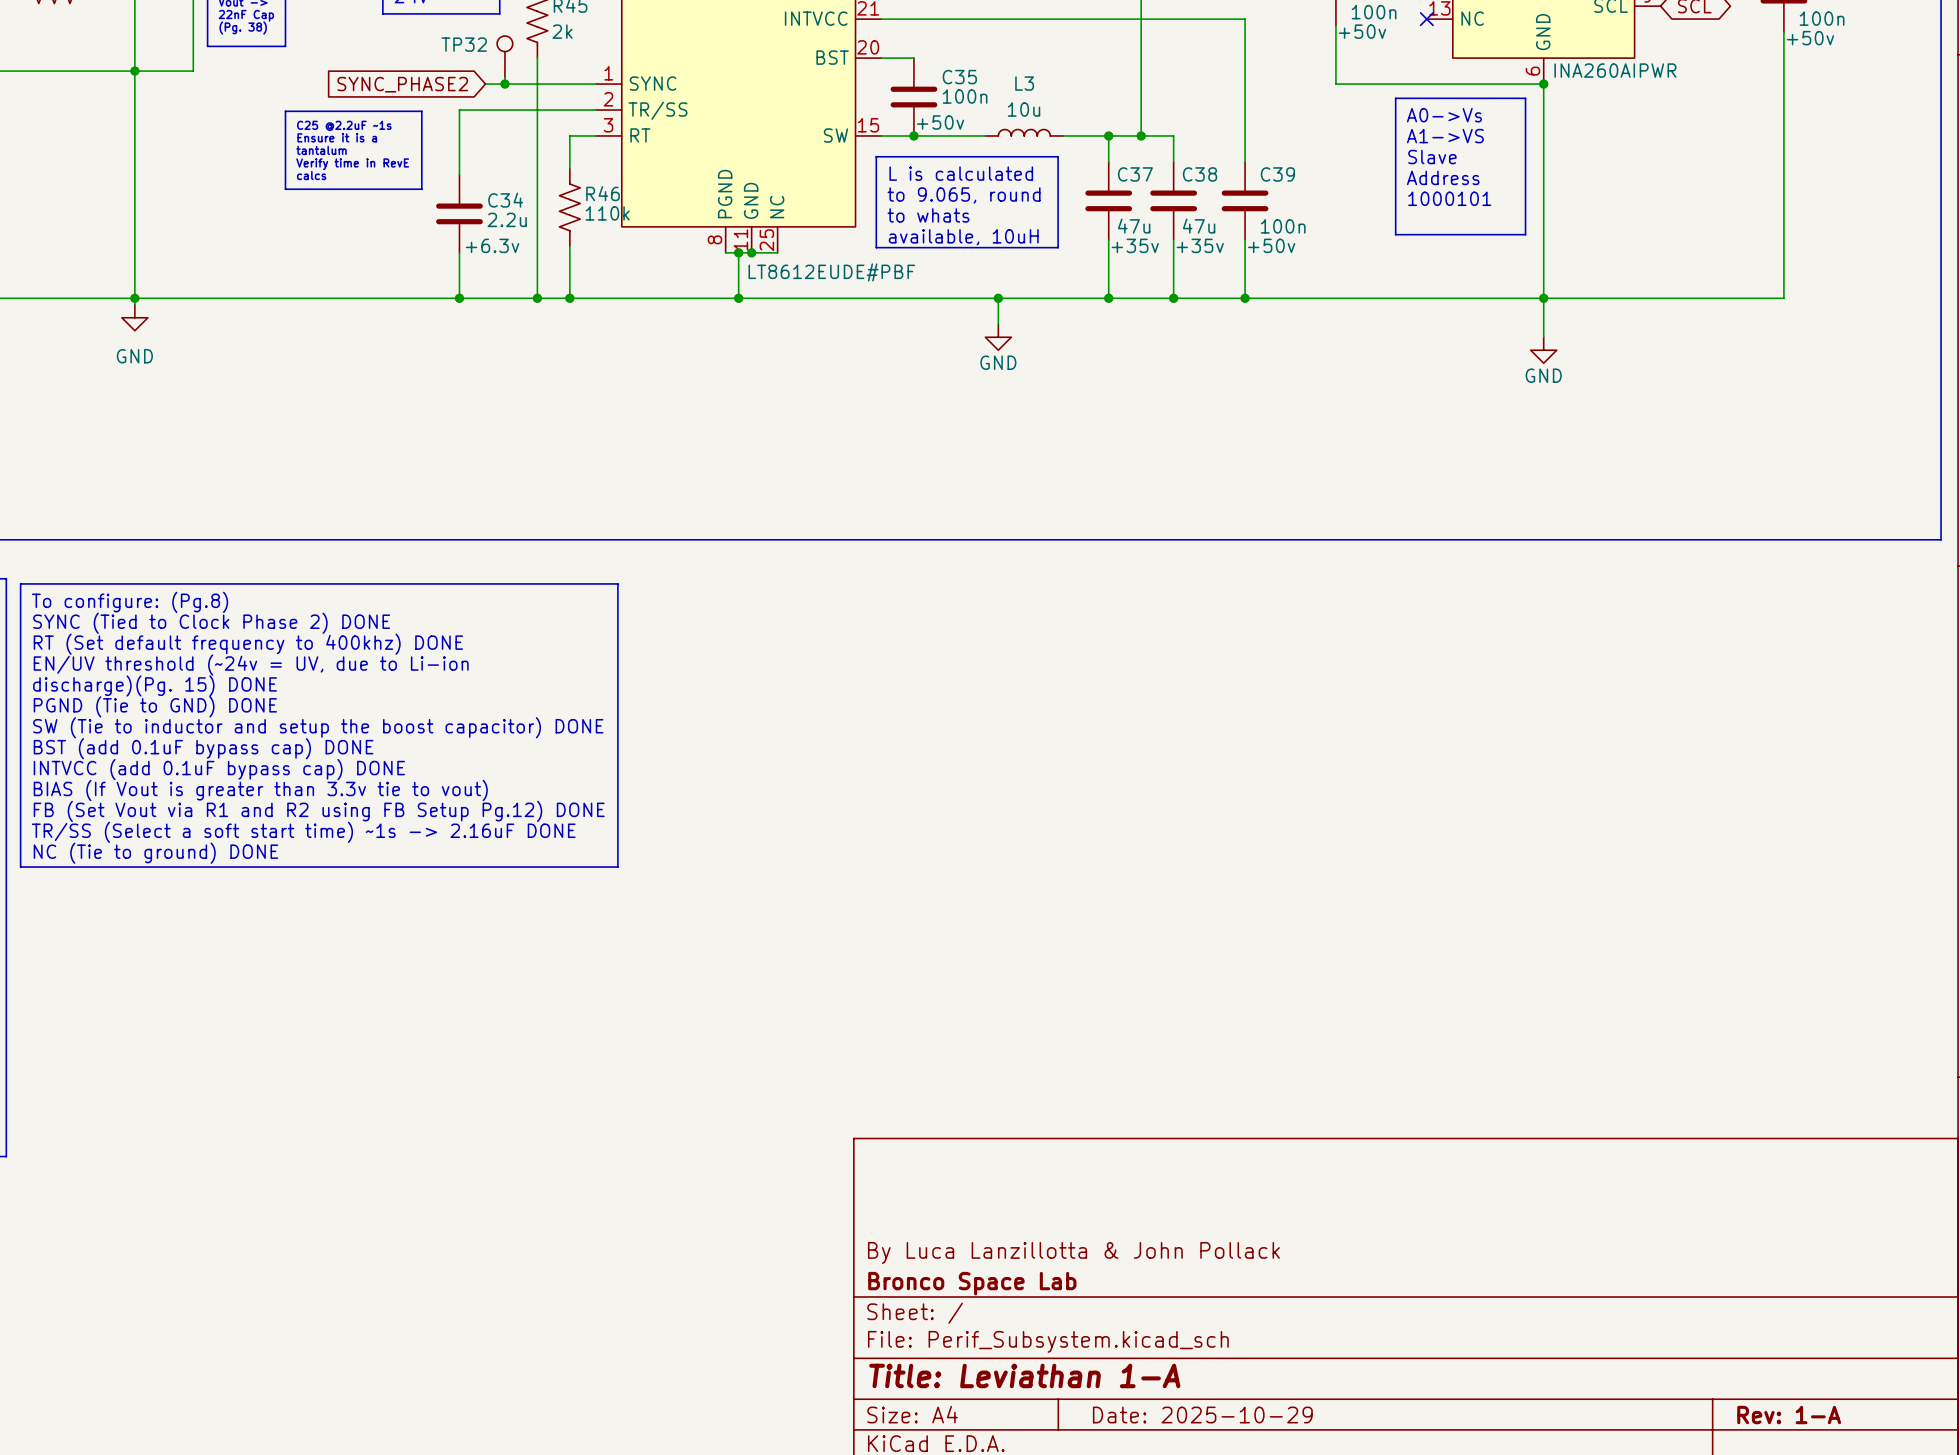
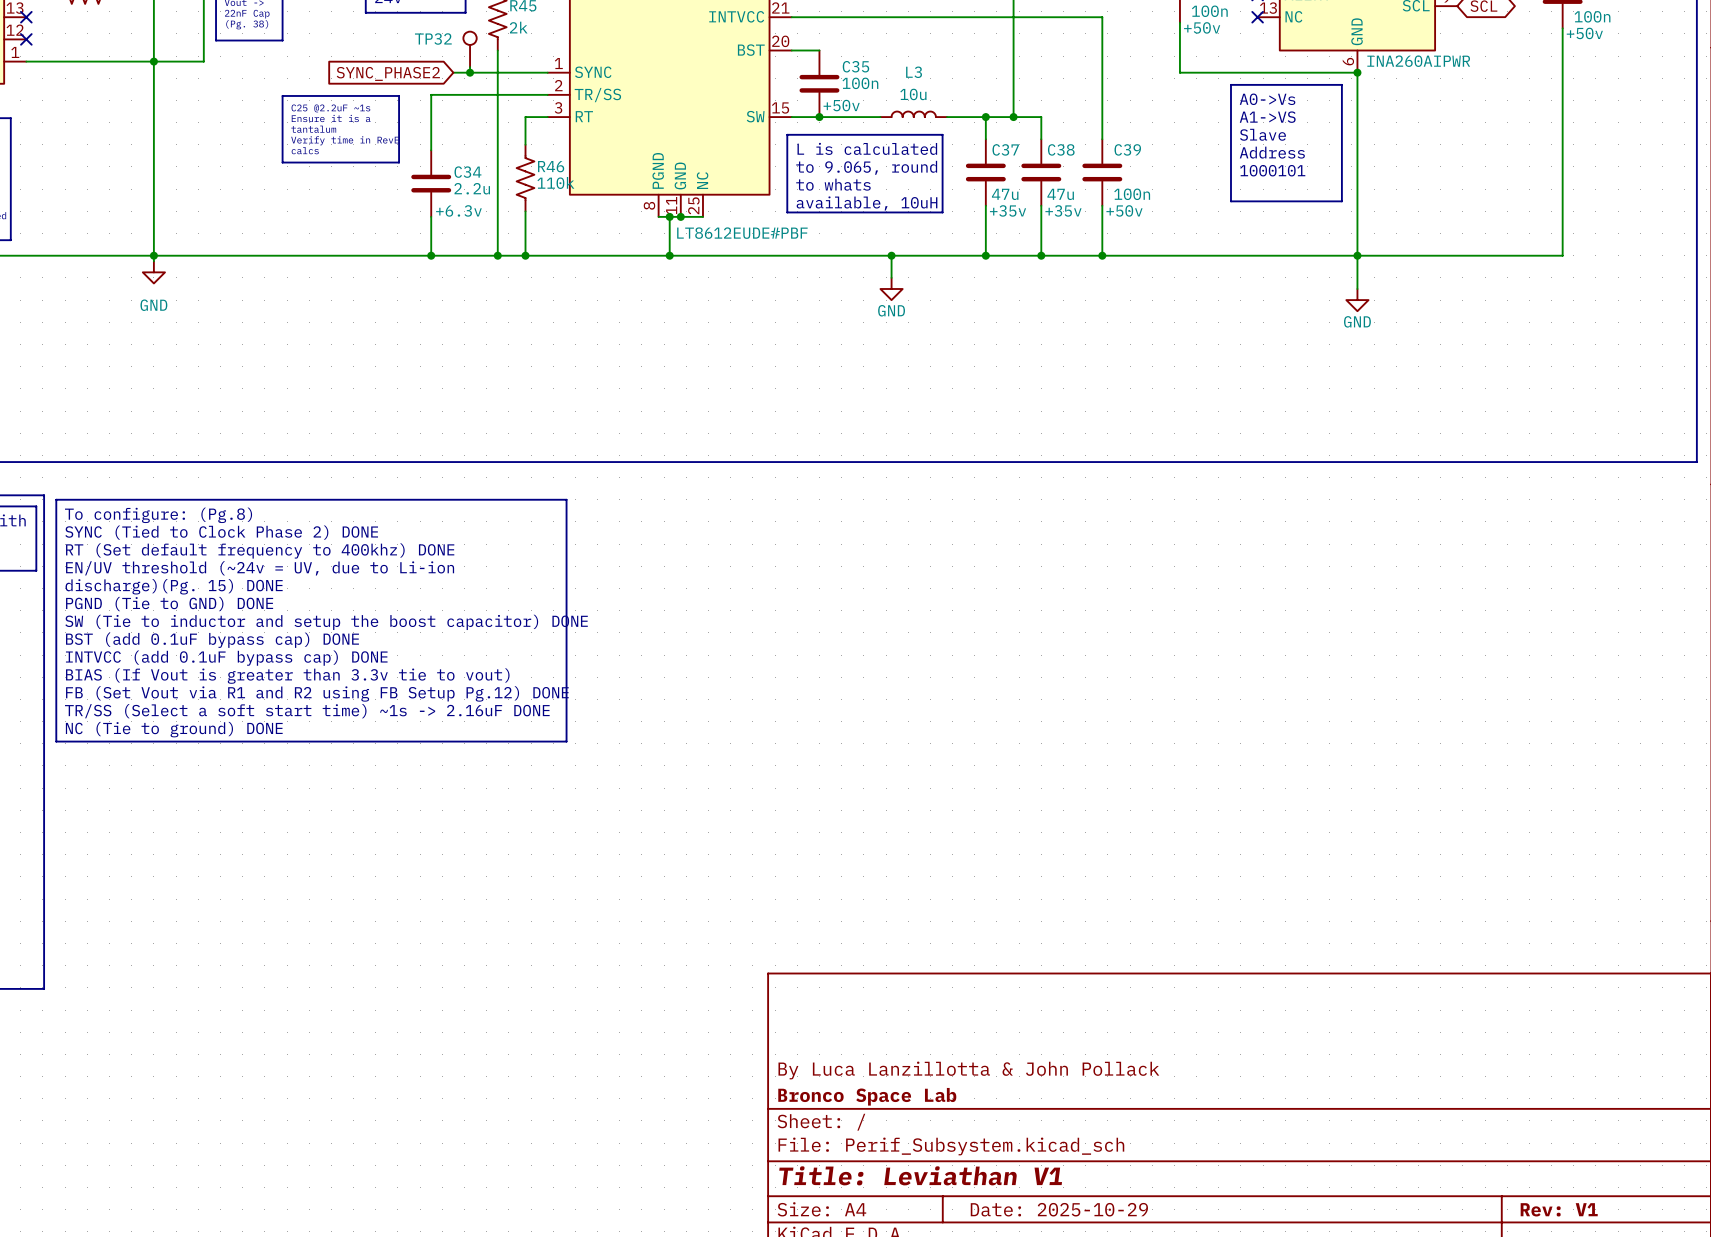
title block: Title: Leviathan 1-A (1024, 1375) -> Title: Leviathan V1 (920, 1175)
title block: Rev: 1-A (1789, 1415) -> Rev: V1 (1559, 1209)

